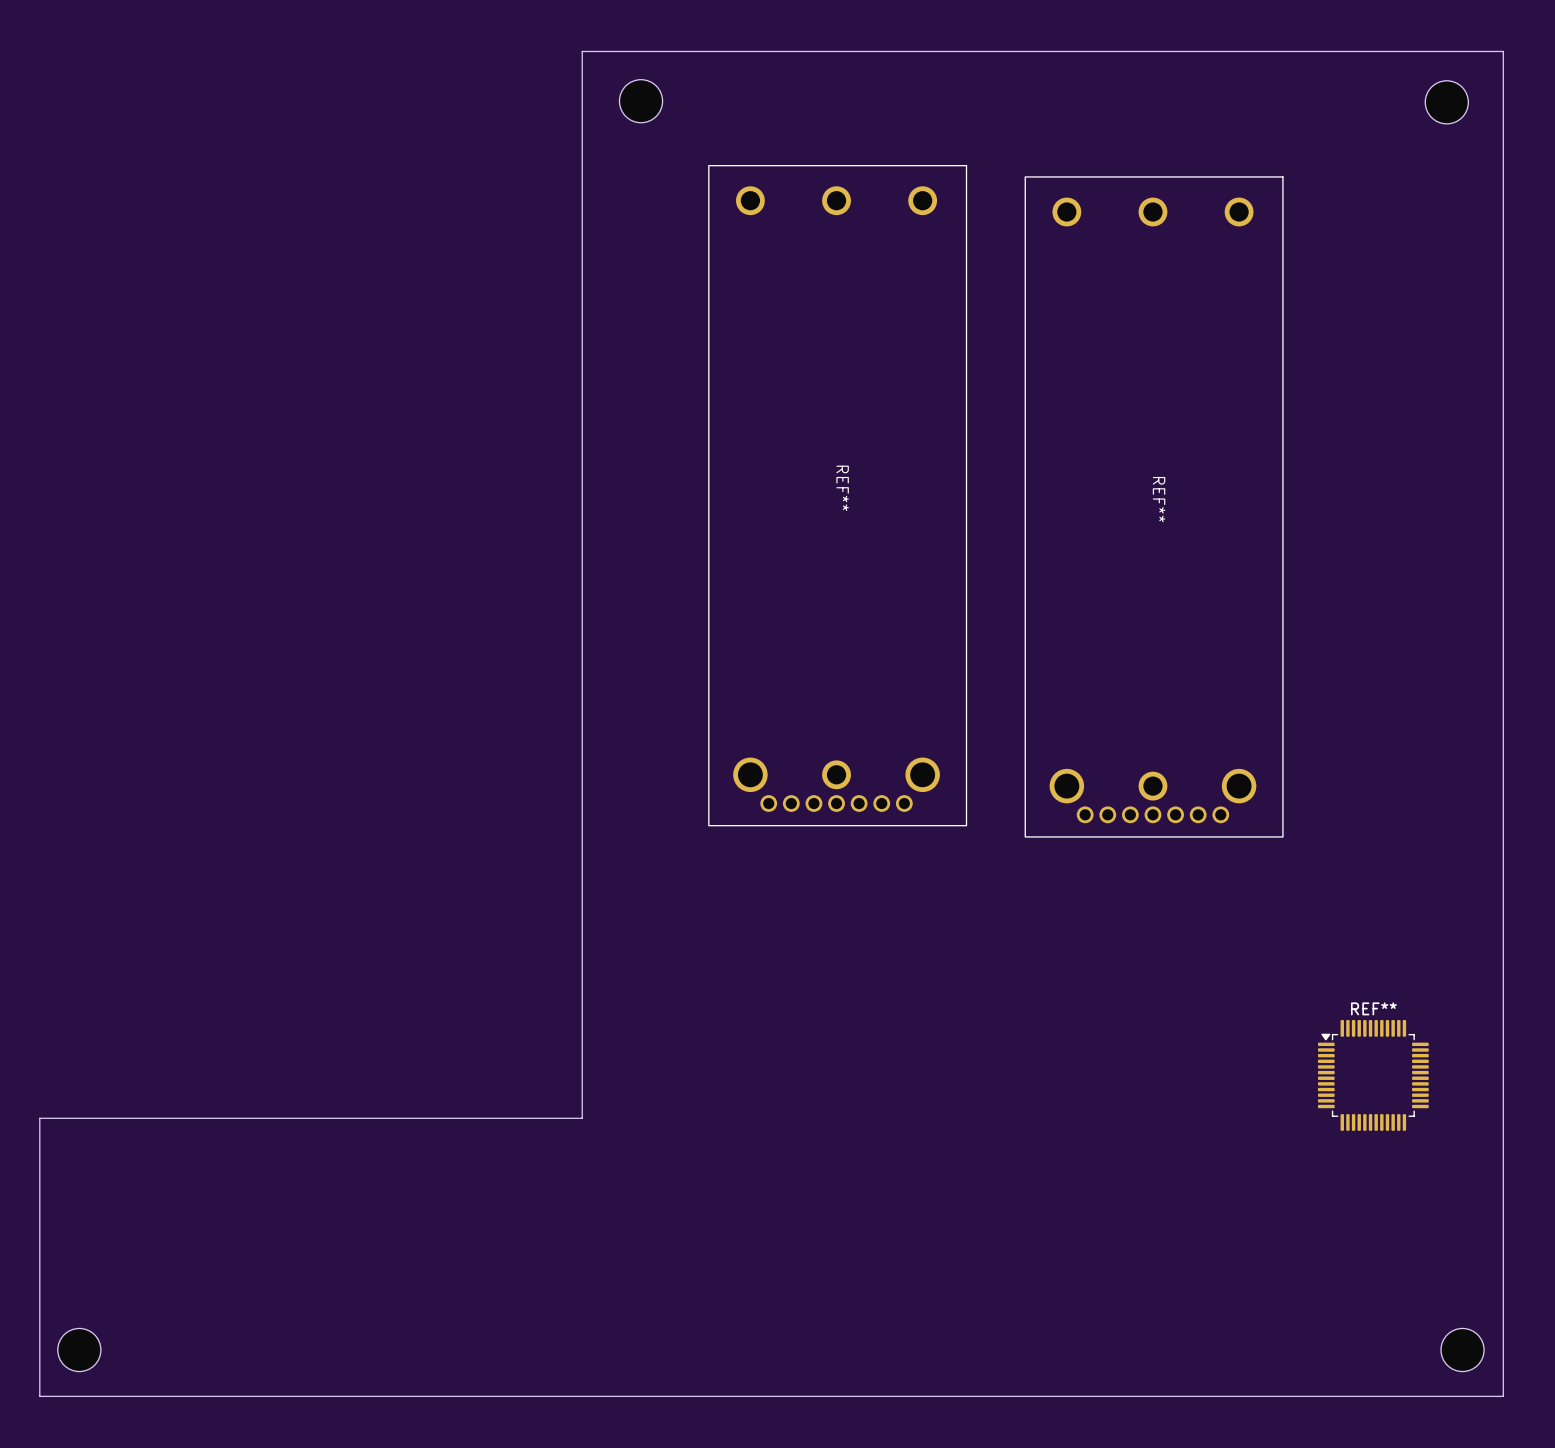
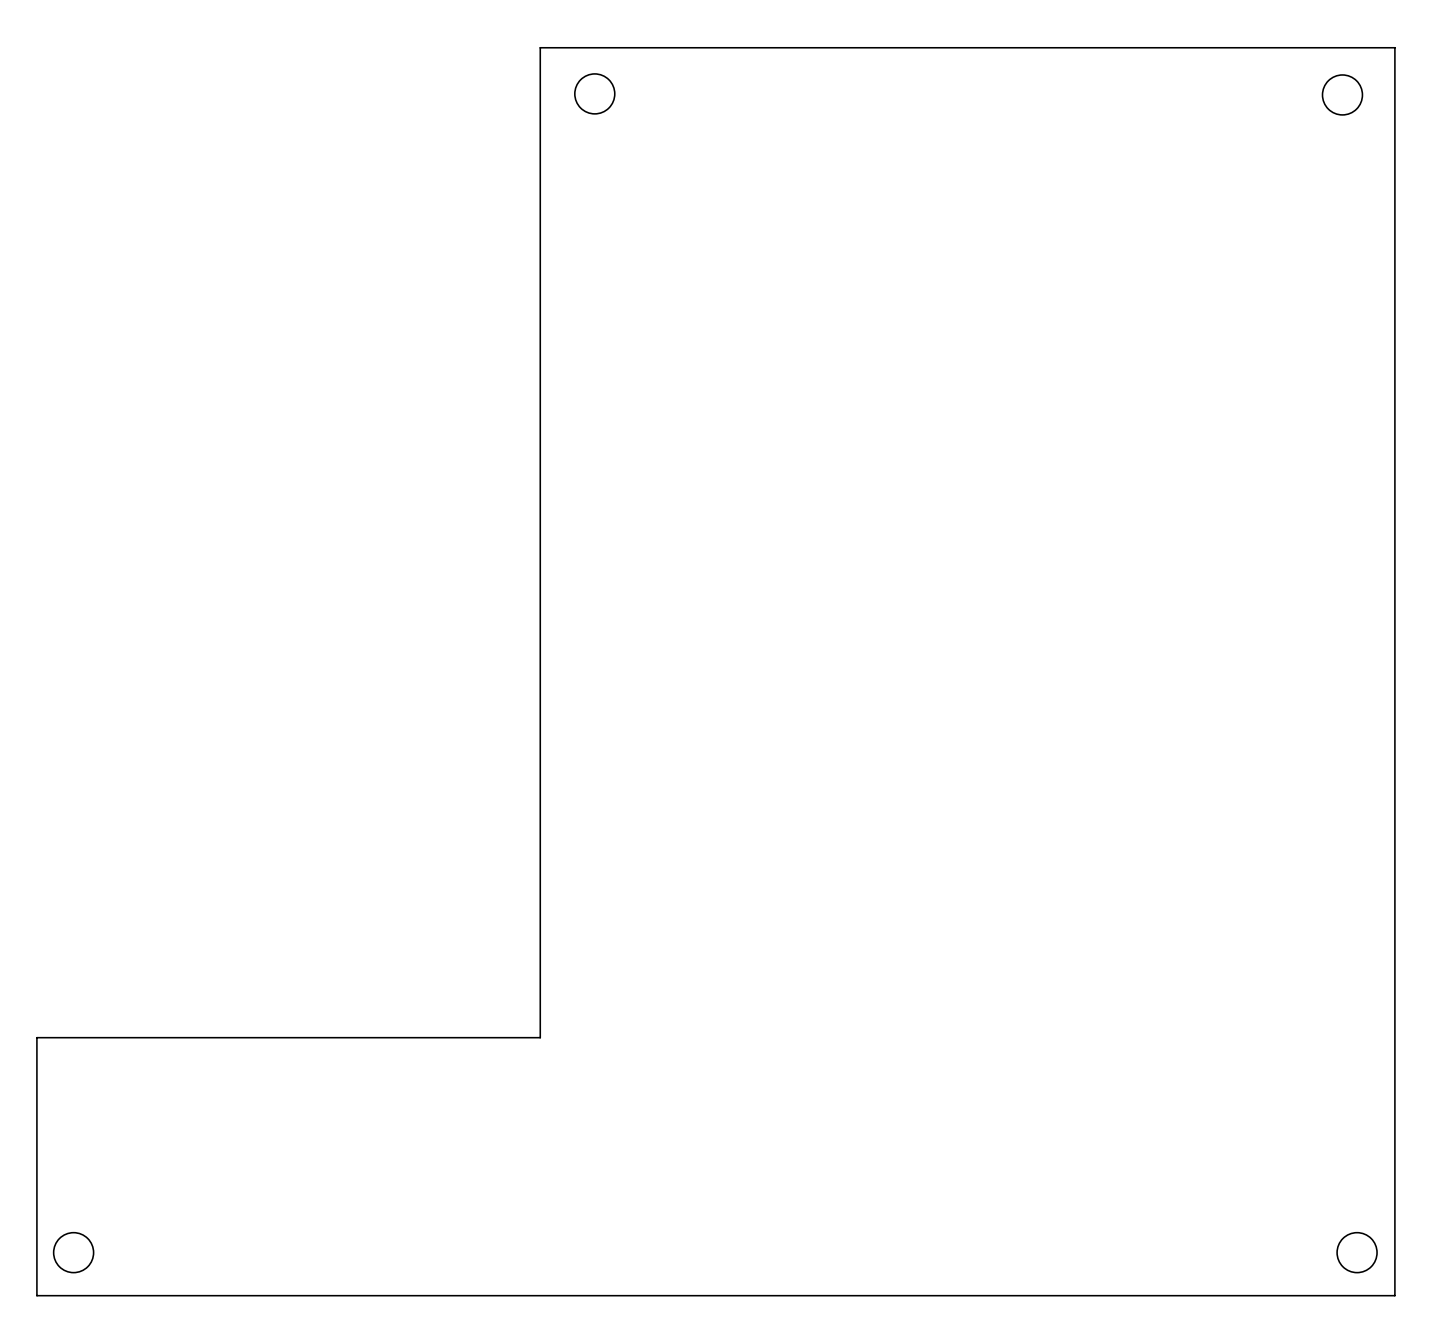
REF**: (837, 495) -> none
REF**: (1154, 506) -> none
REF**: (1373, 1075) -> none

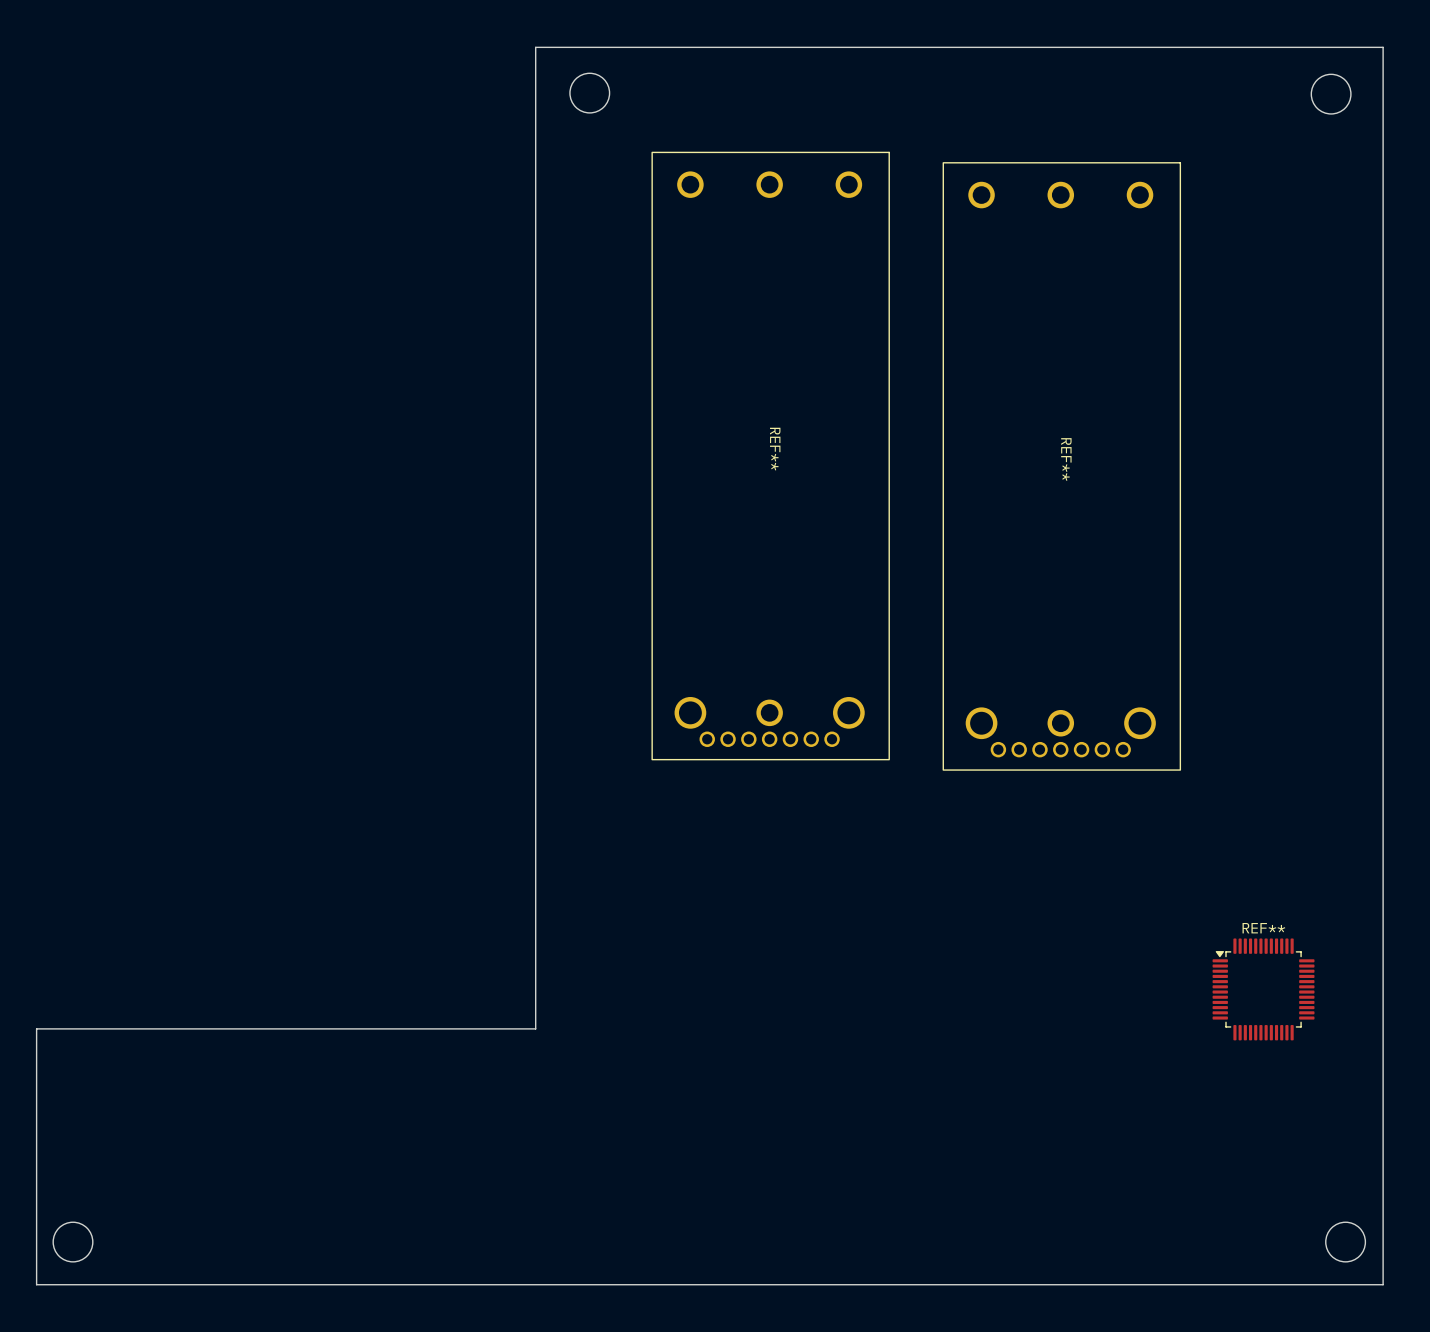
REF**: none -> (770, 456)
REF**: none -> (1061, 466)
REF**: none -> (1263, 989)

